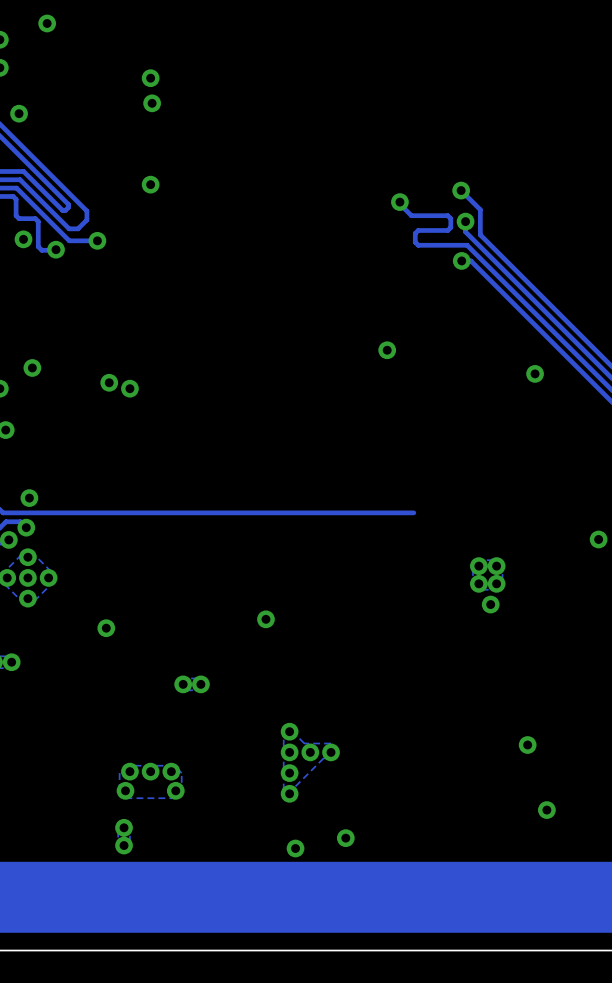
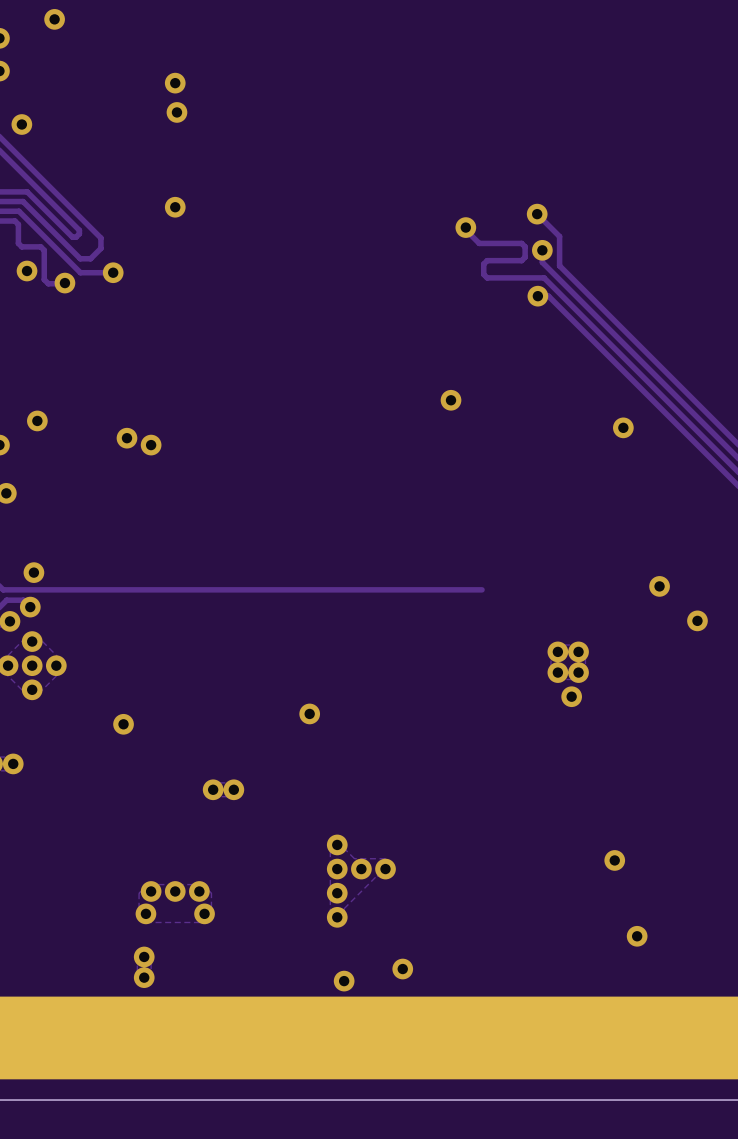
via: none -> (659, 586)

